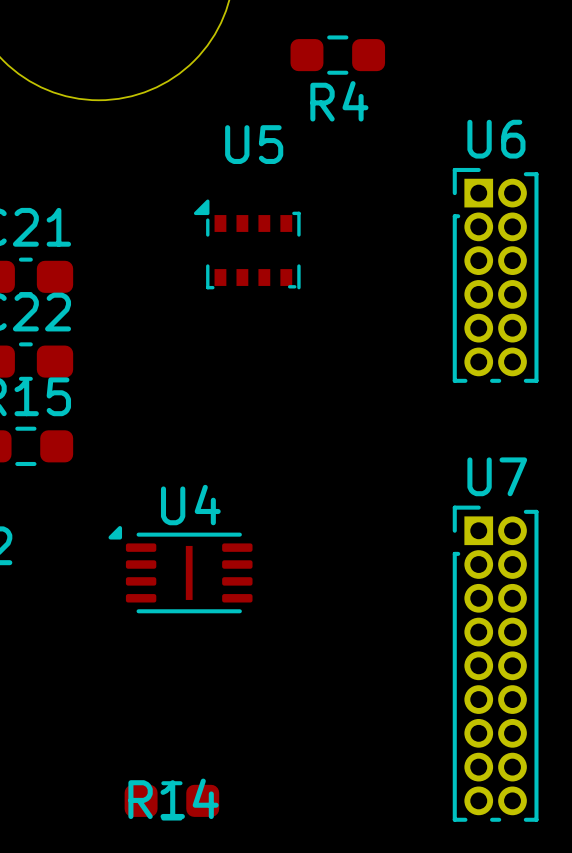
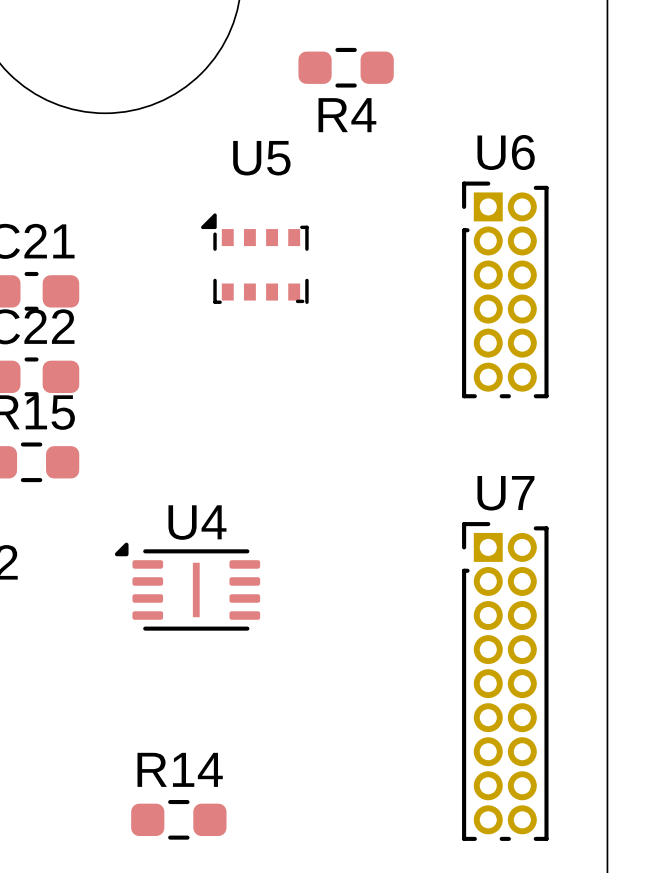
R14 name position: R14 (173, 798) -> R14 (180, 769)

